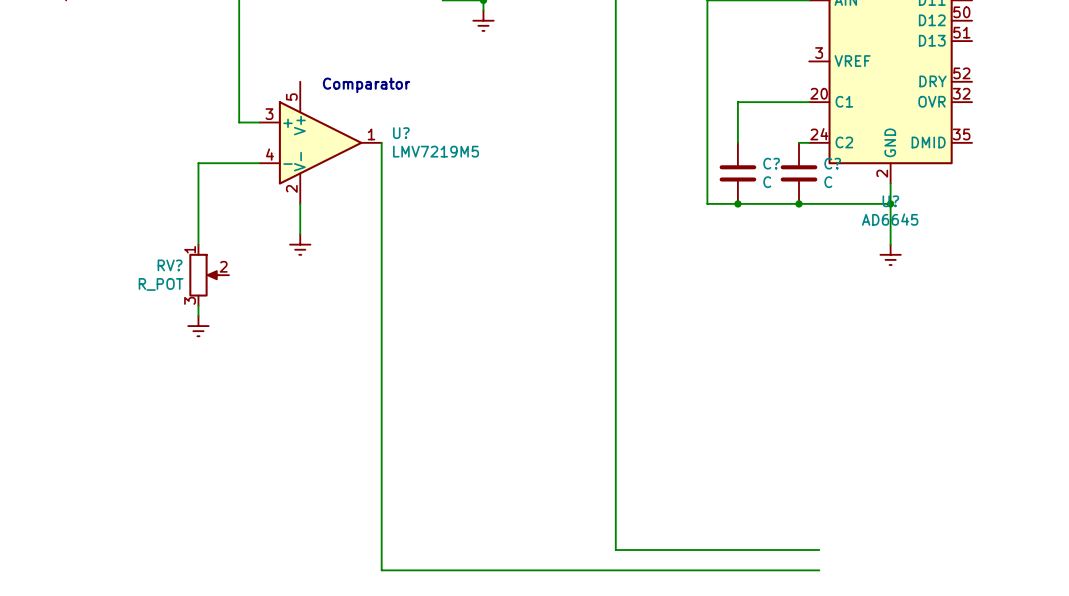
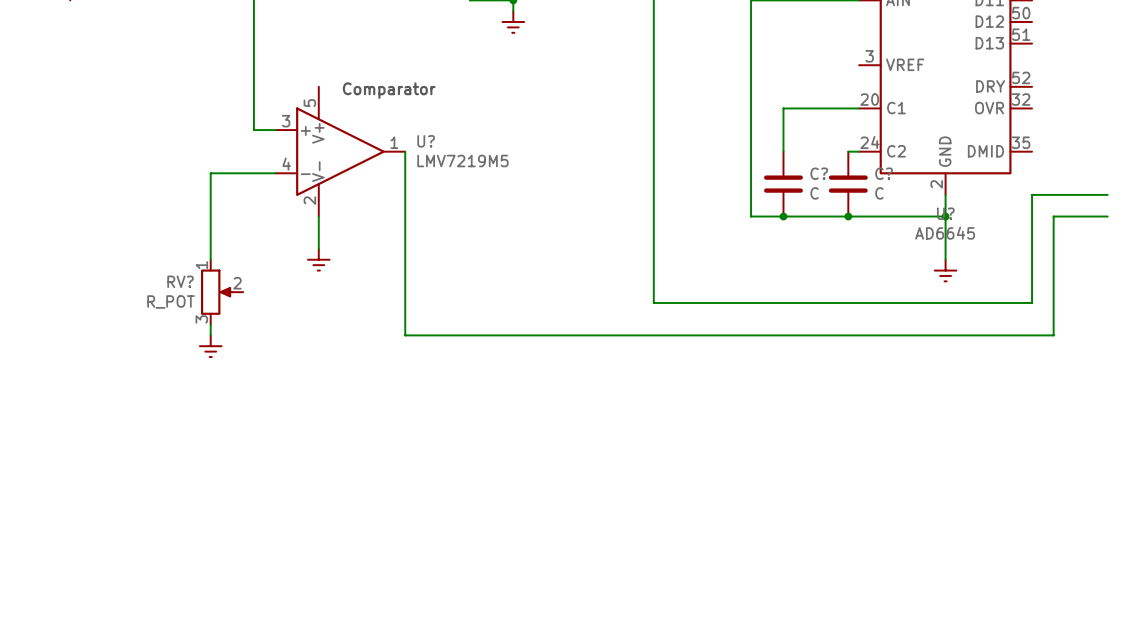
wire: (615, 285) (615, 550) (819, 550) -> (653, 302) (1032, 302) (1032, 194) (1107, 194)
wire: (381, 315) (381, 570) (819, 570) -> (405, 335) (1053, 335) (1053, 216) (1107, 216)

